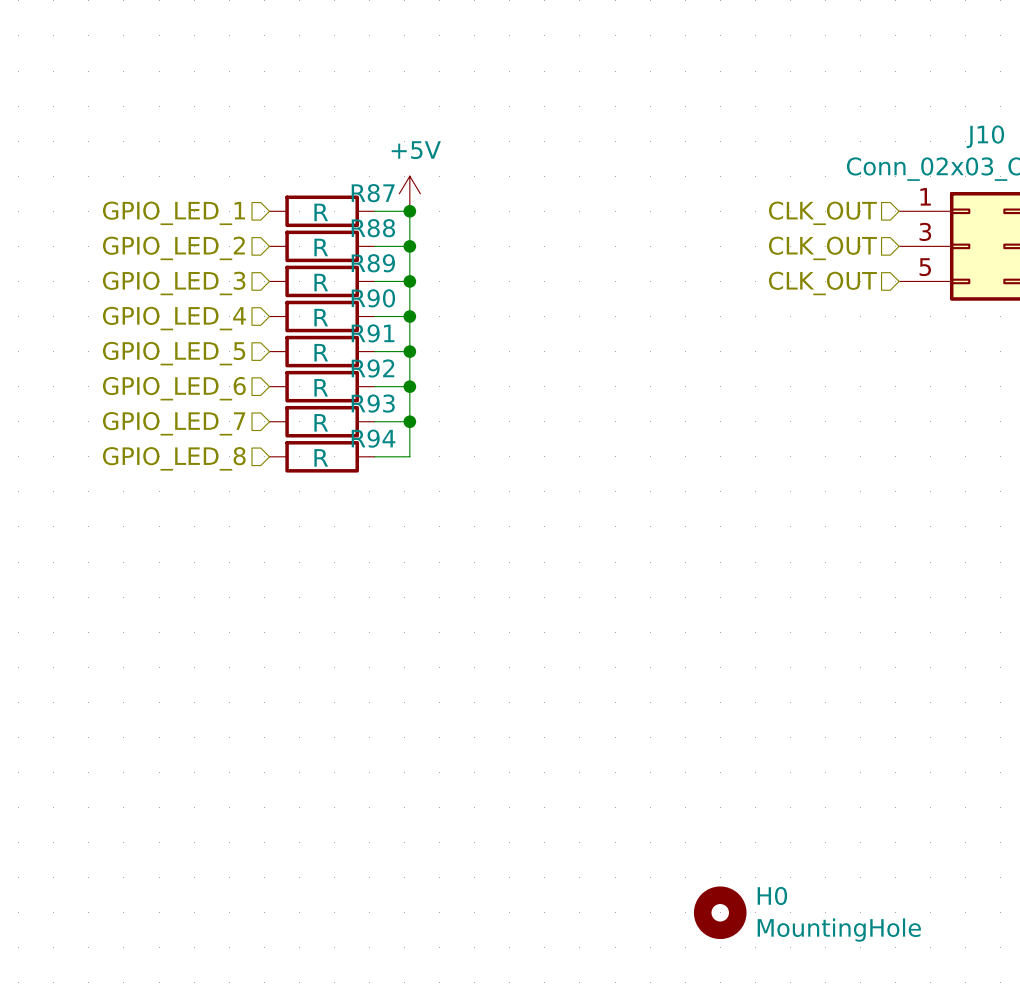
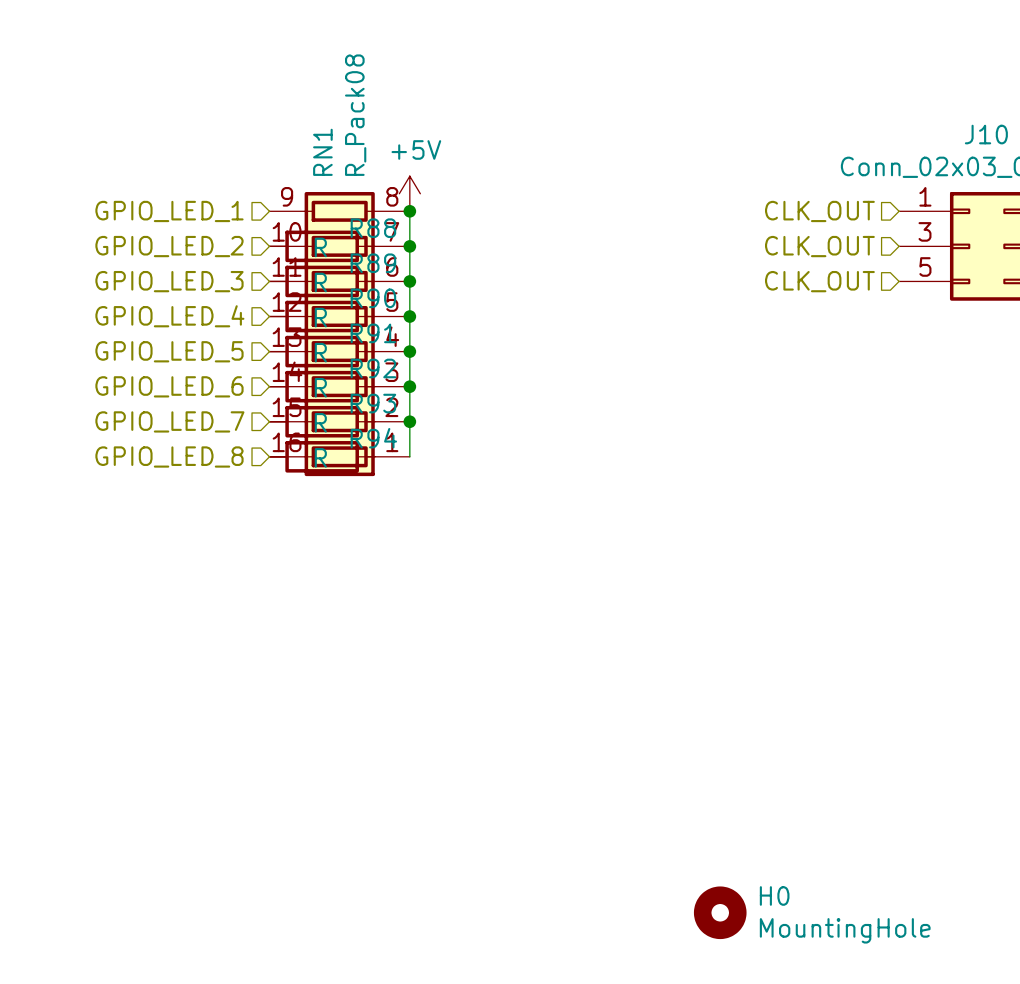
R87: R (322, 211) -> none
RN1: none -> R_Pack08 (339, 334)

